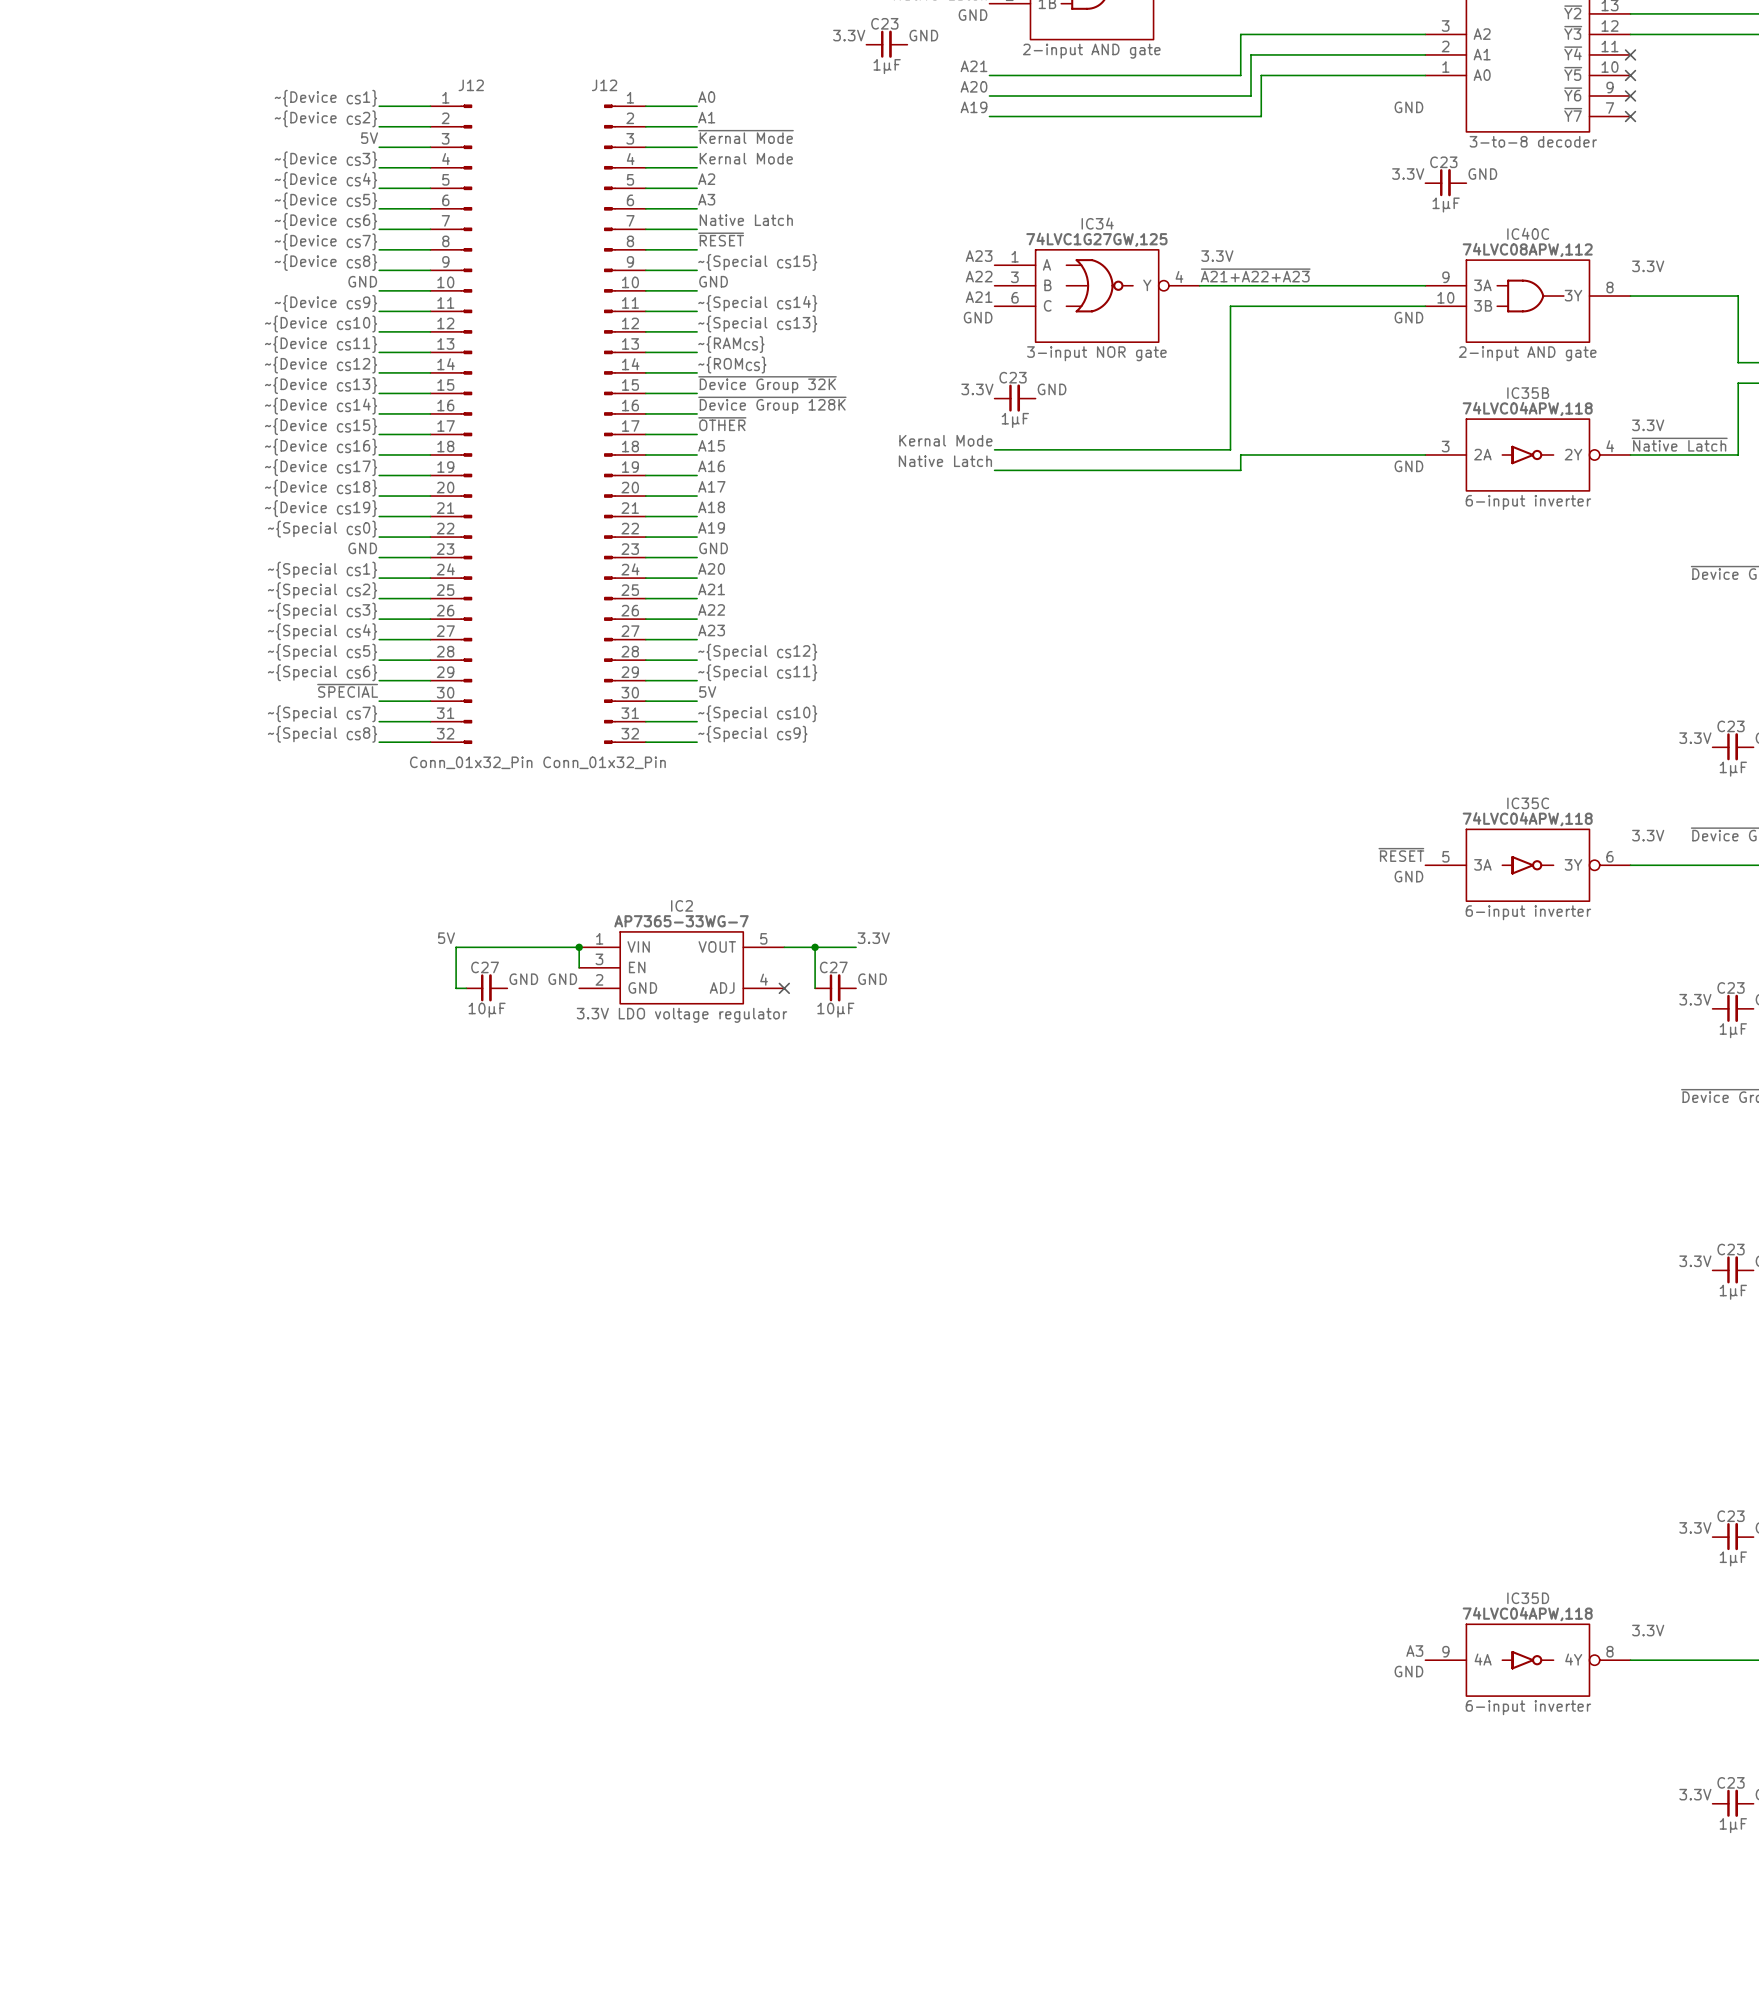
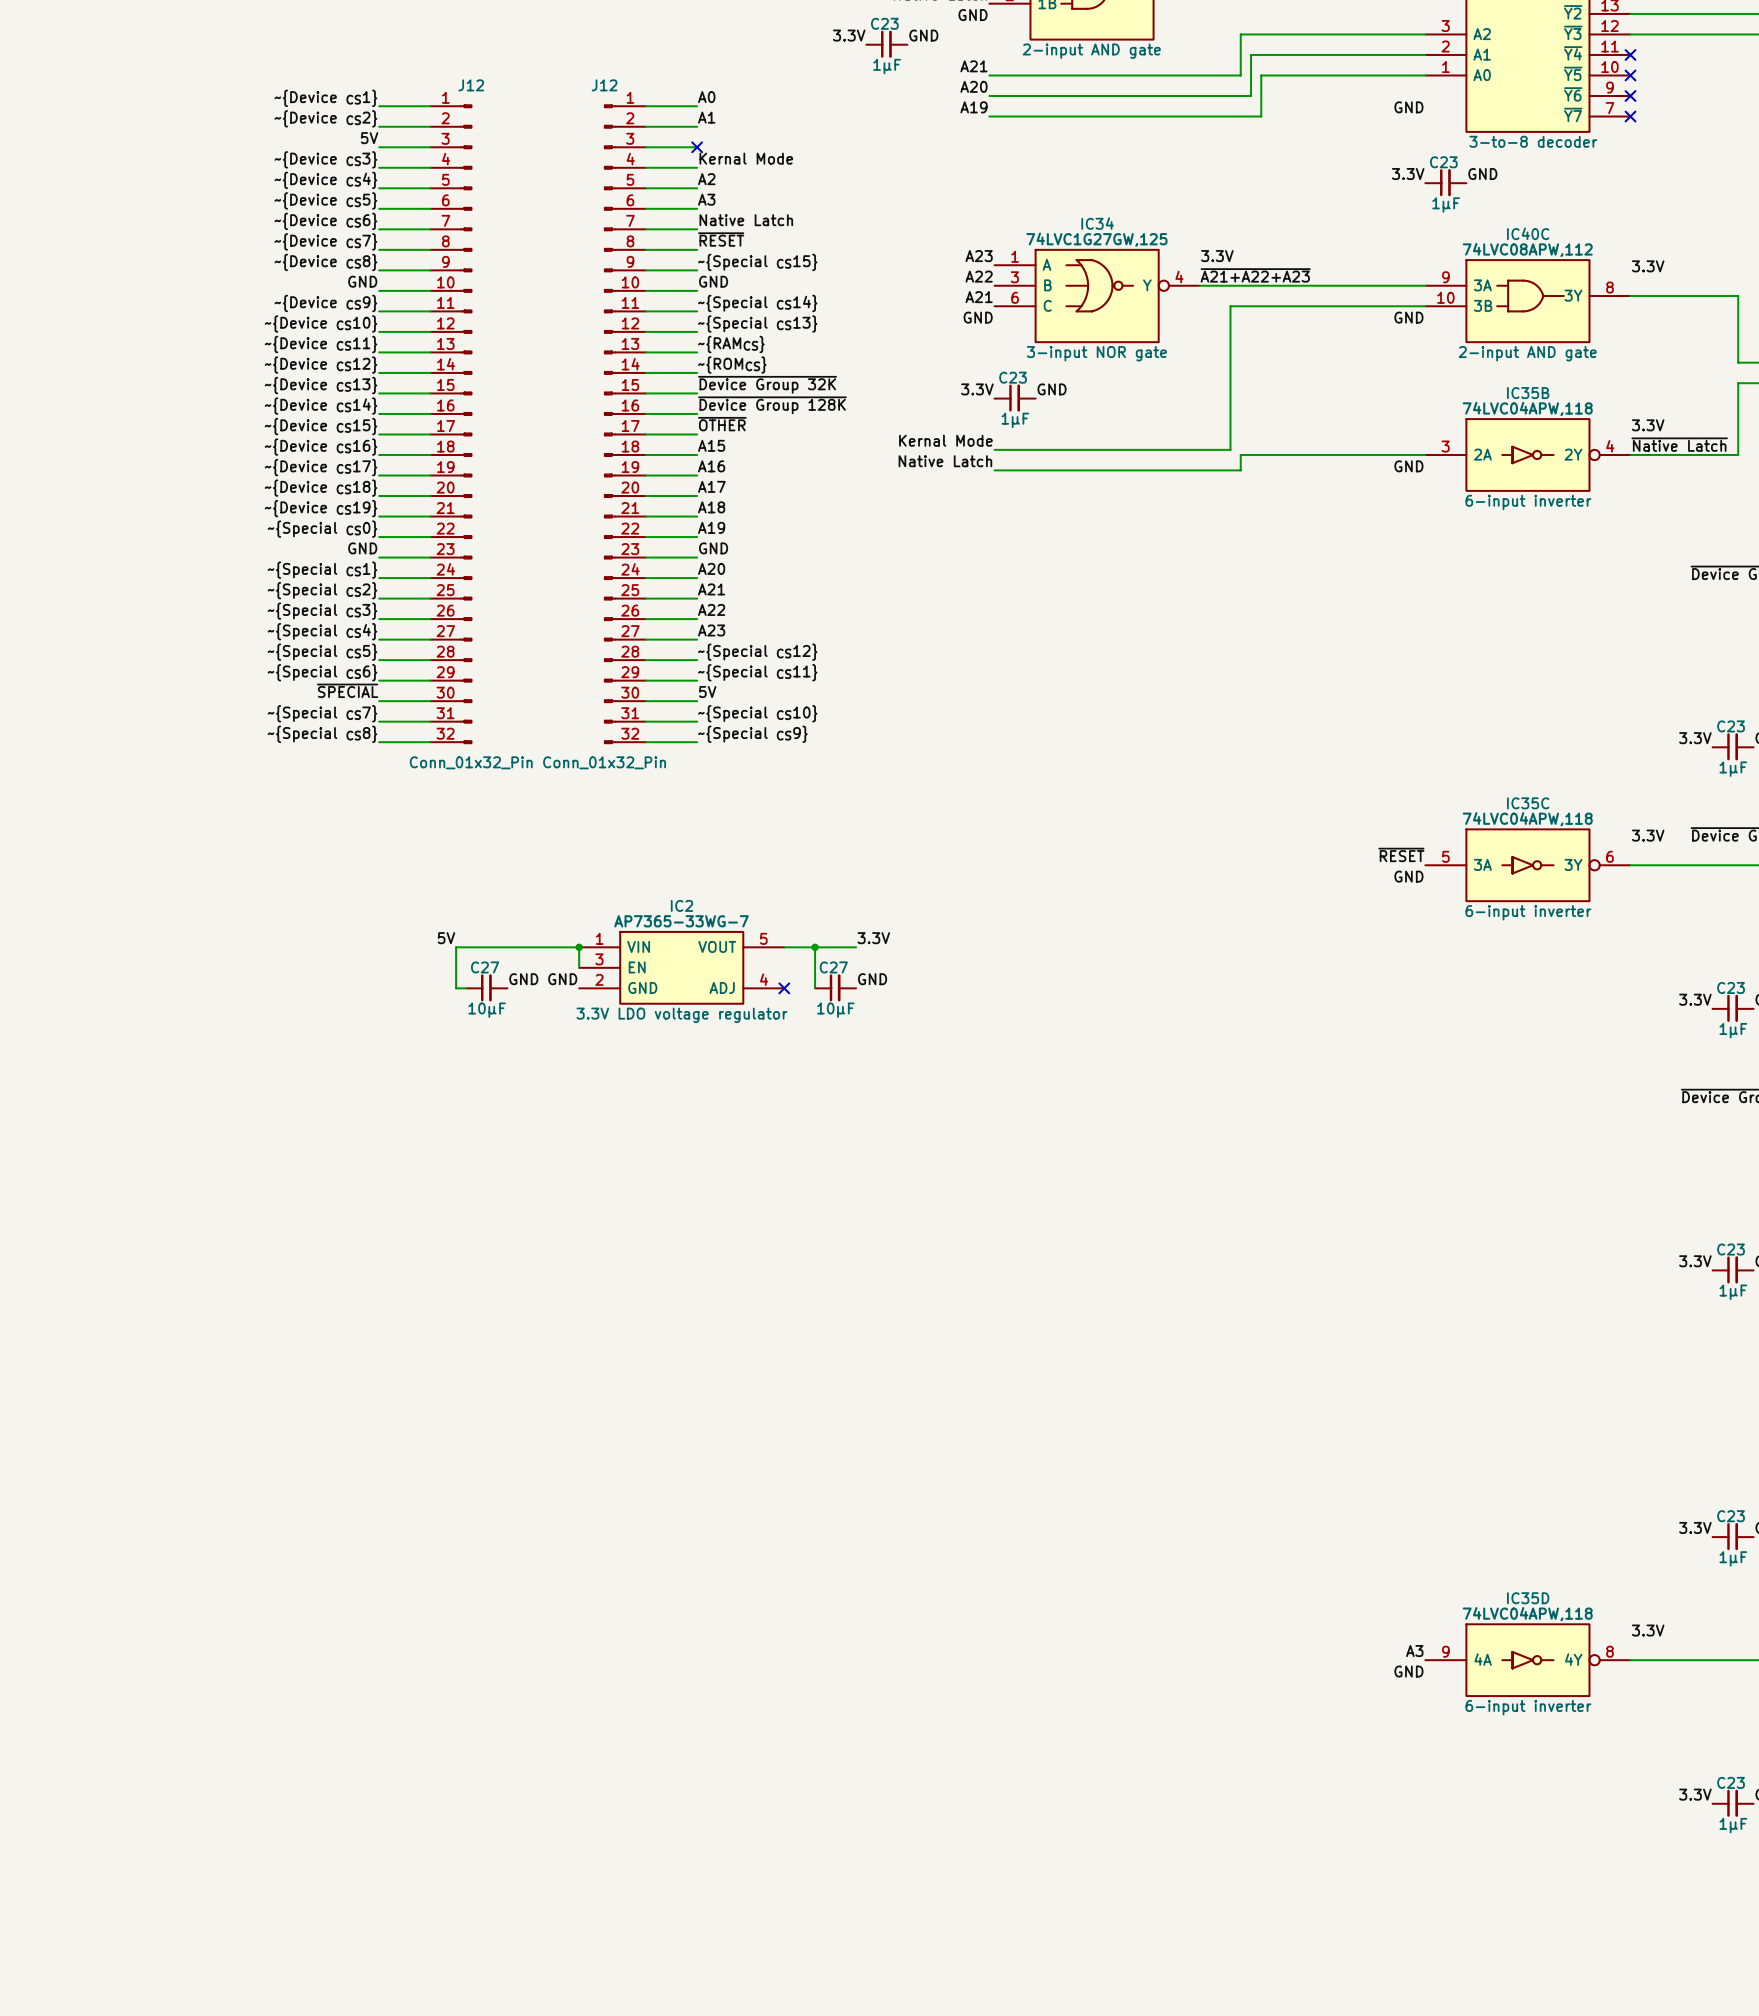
label: ~{Kernal Mode} (746, 136) -> none
no-connect mark: none -> (697, 147)

